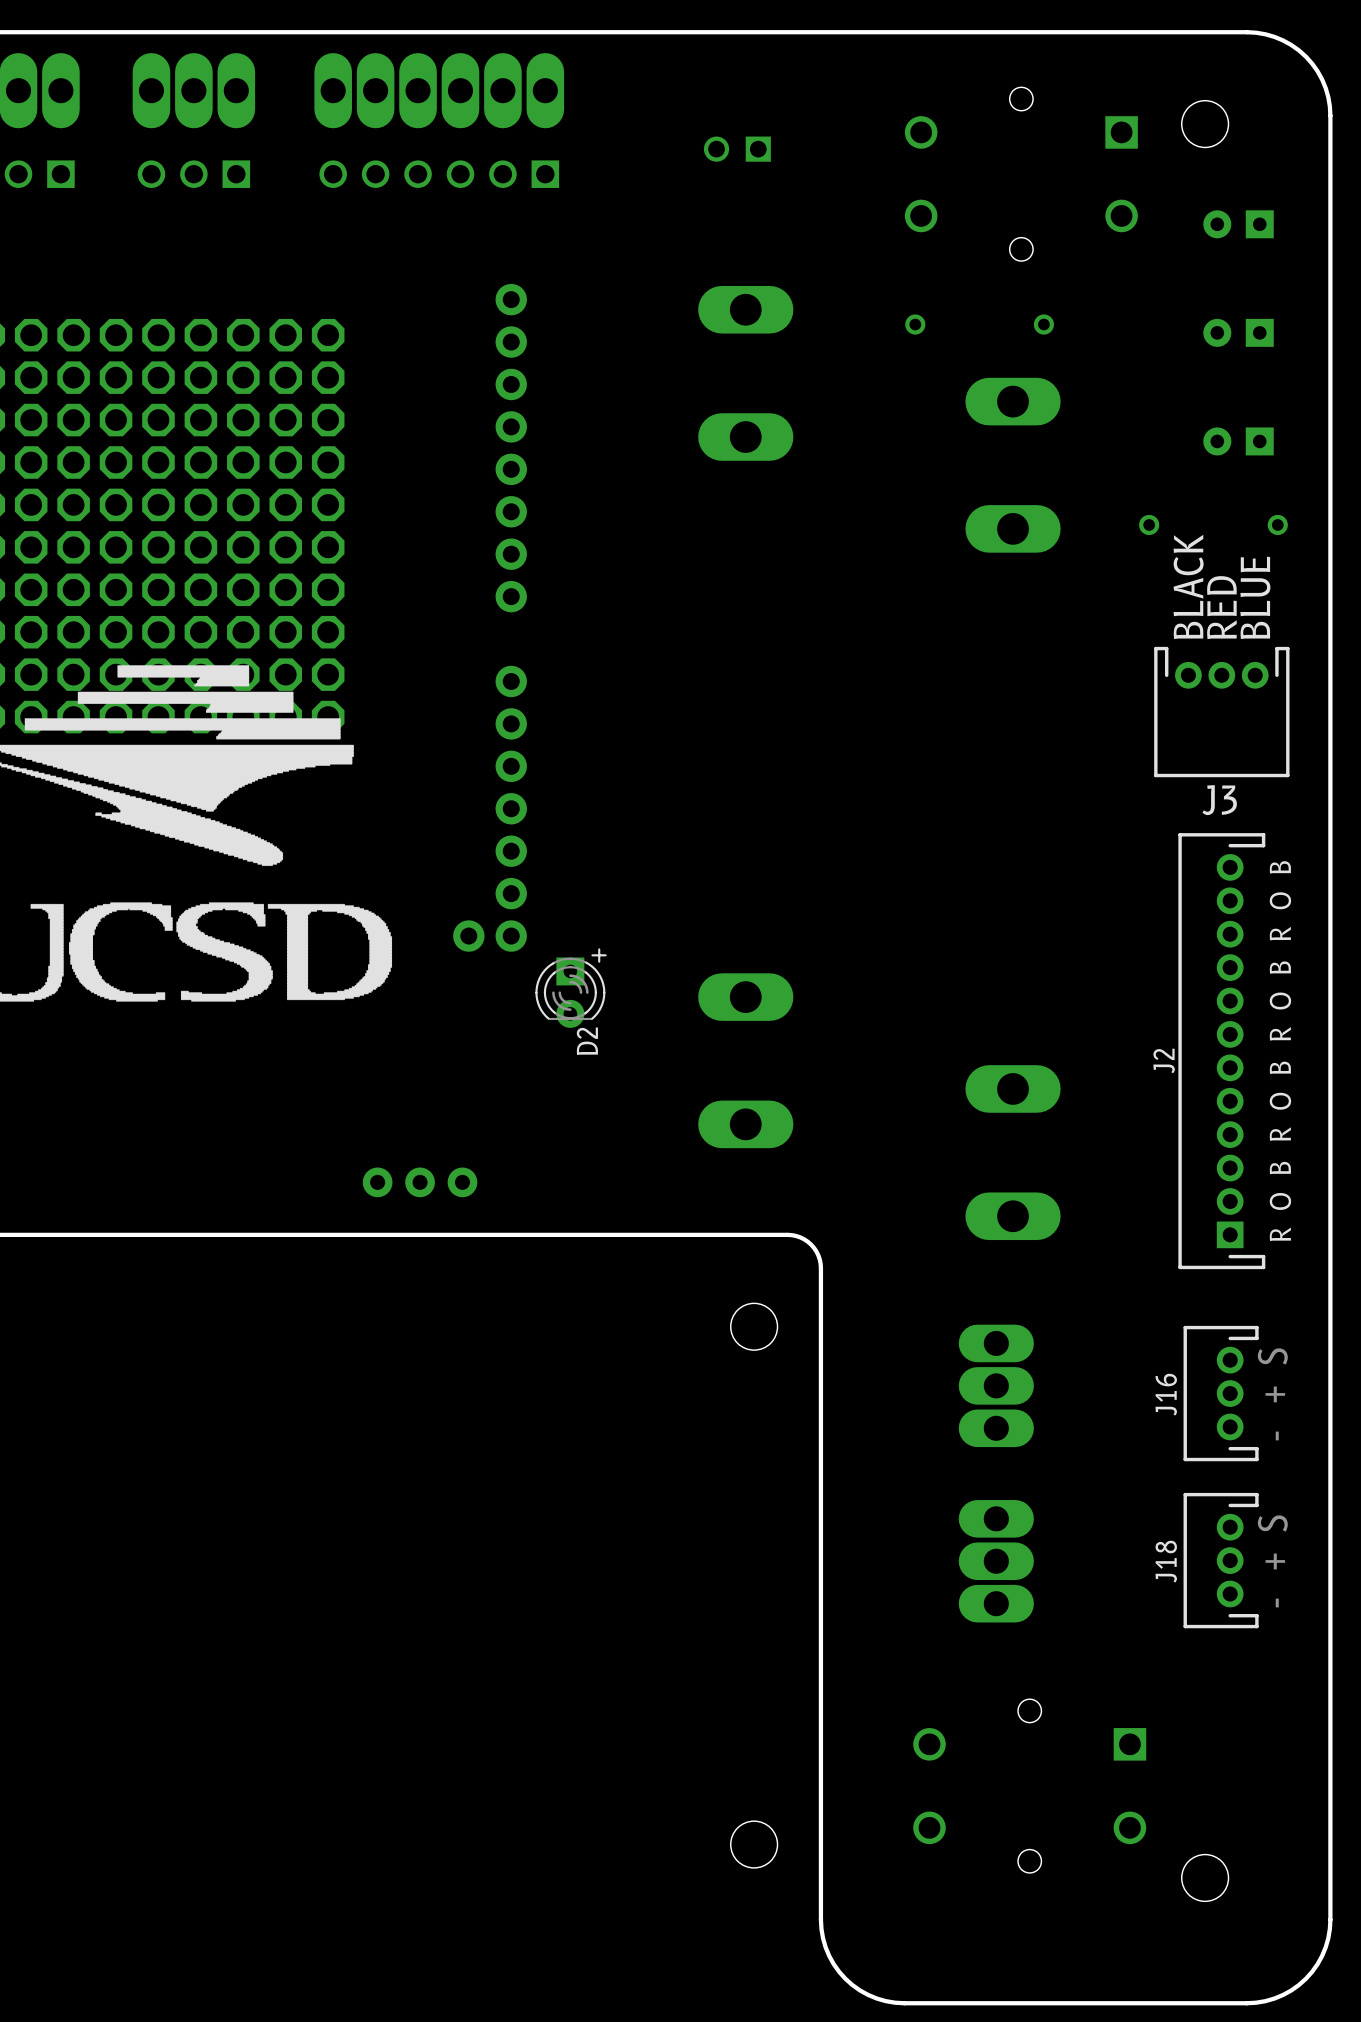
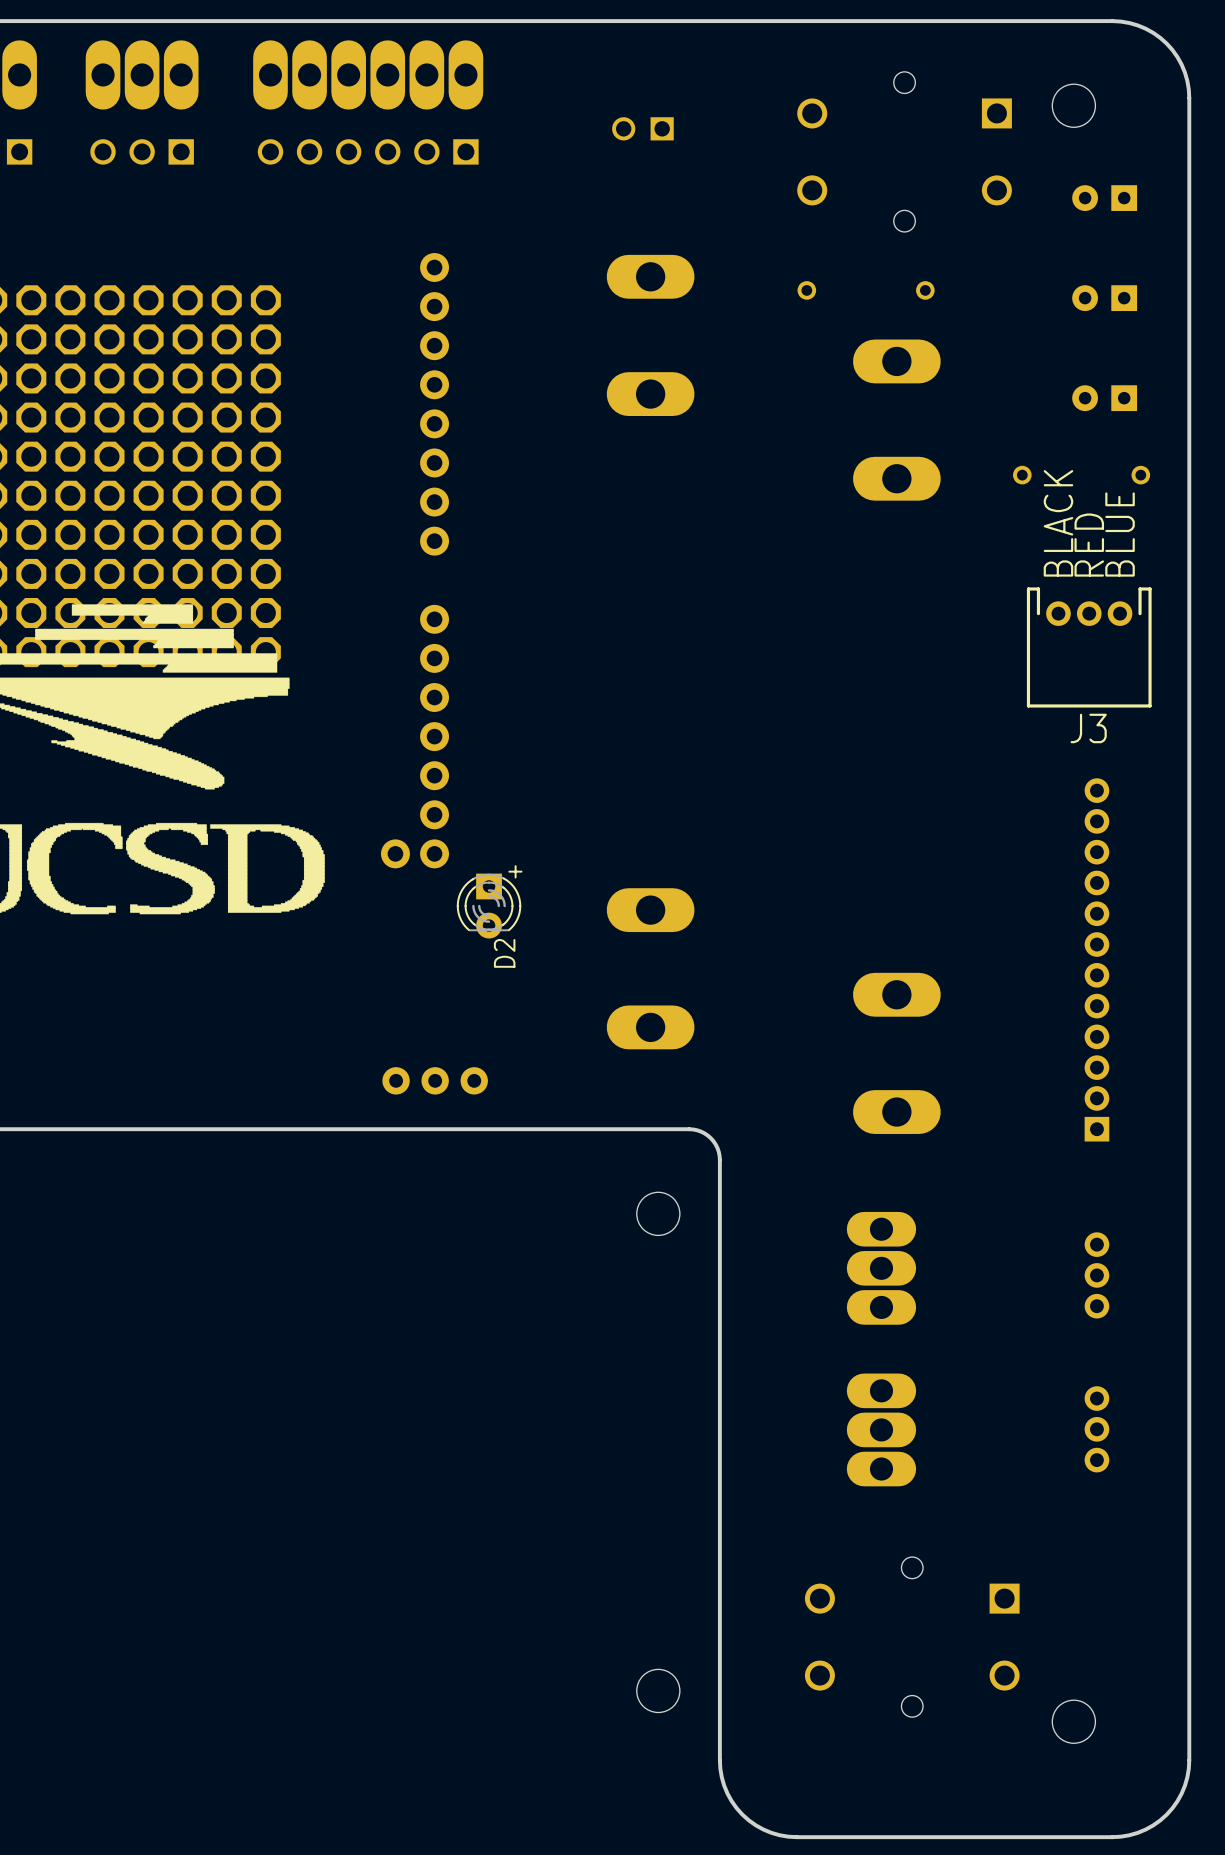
J2 side: bottom (1221, 1051) -> top (1096, 959)
part position: (420, 1182) -> (435, 1080)
J16 side: bottom (1221, 1393) -> top (1096, 1275)
J18 side: bottom (1221, 1560) -> top (1096, 1429)

